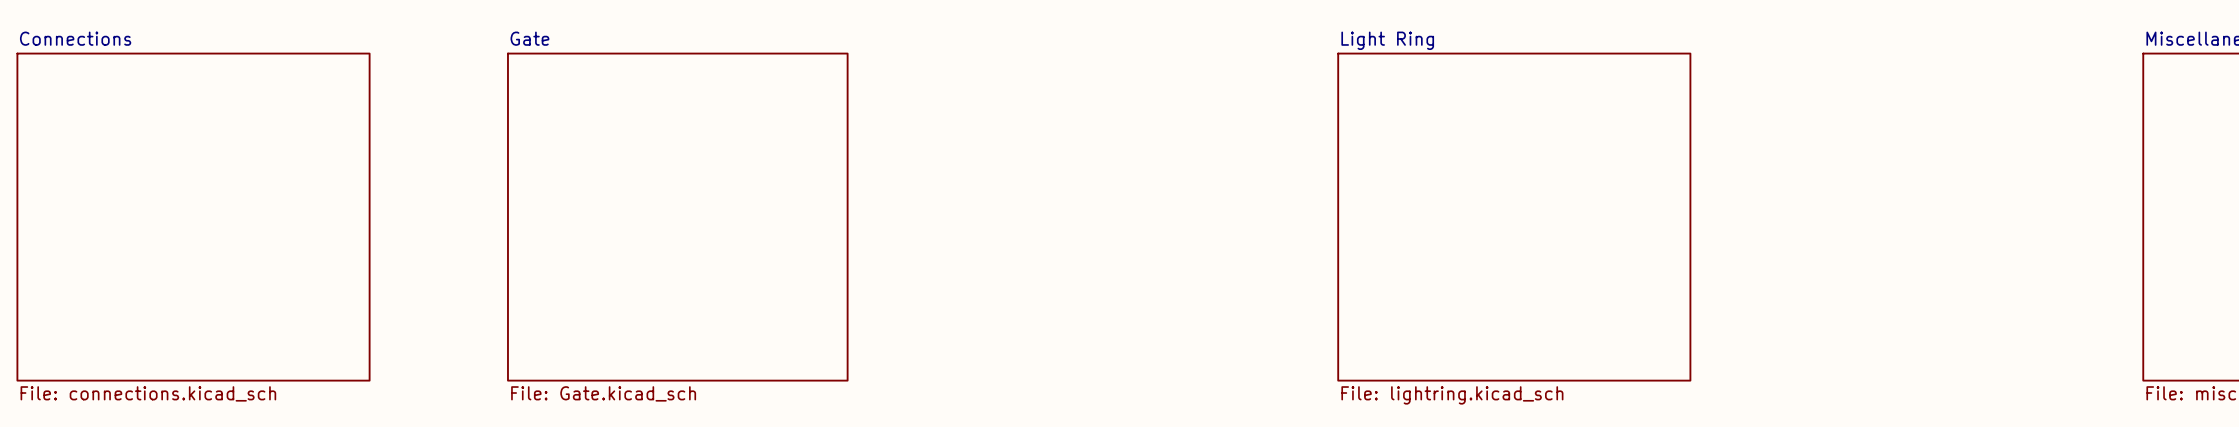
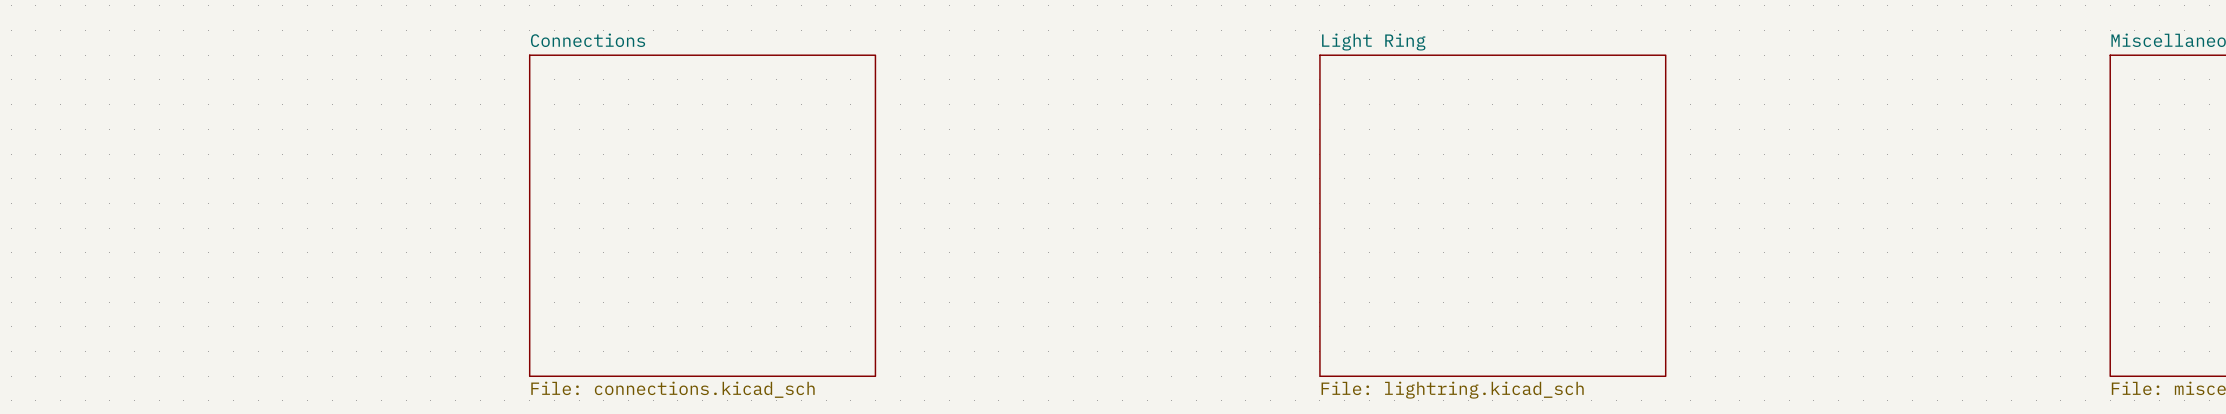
sheet Connections: File: connections.kicad_sch (193, 217) -> none
sheet Gate: File: Gate.kicad_sch (677, 217) -> none
sheet Connections: none -> File: connections.kicad_sch (702, 215)

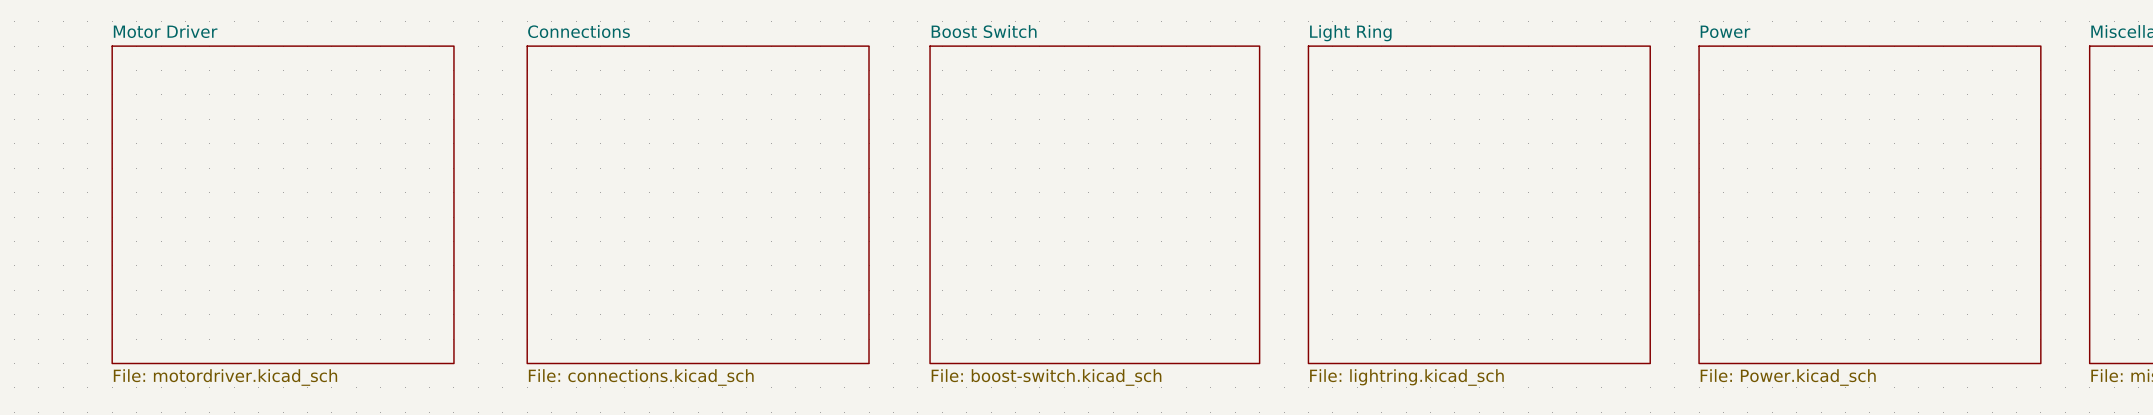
sheet Motor Driver: none -> File: motordriver.kicad_sch (283, 204)
sheet Boost Switch: none -> File: boost-switch.kicad_sch (1094, 204)
sheet Power: none -> File: Power.kicad_sch (1869, 204)

